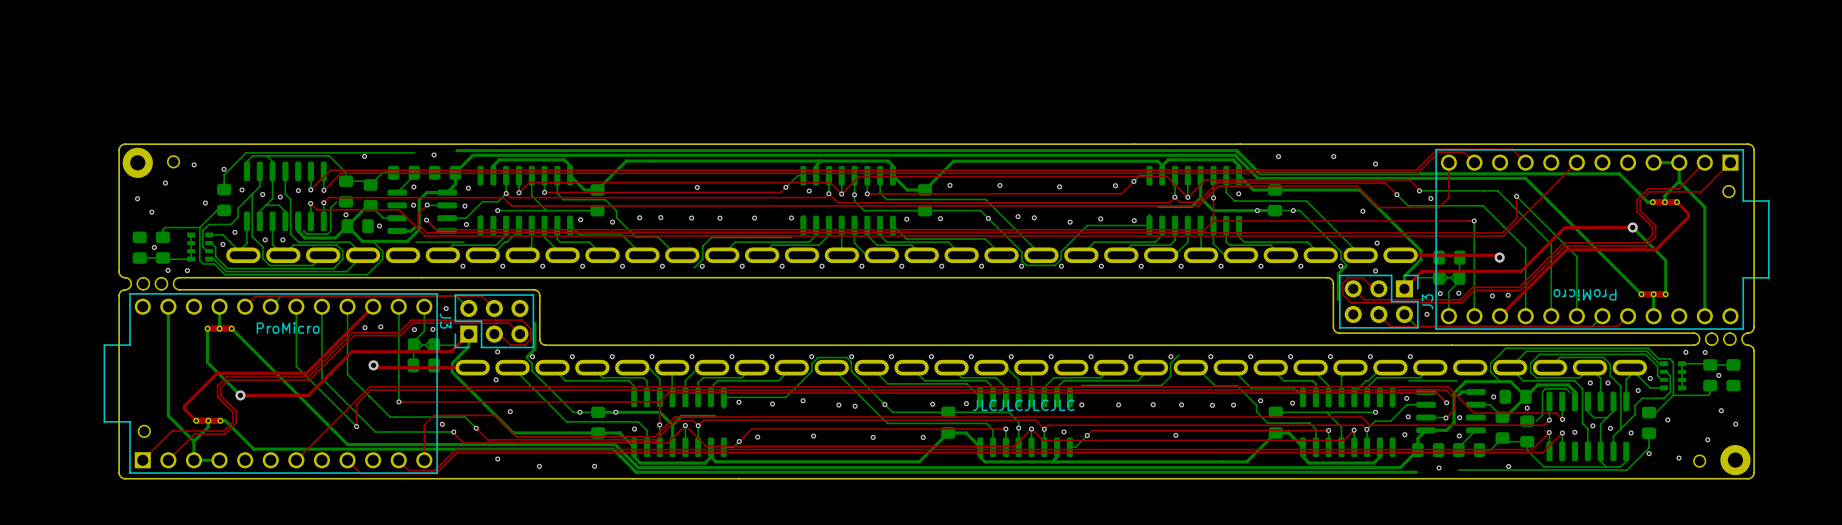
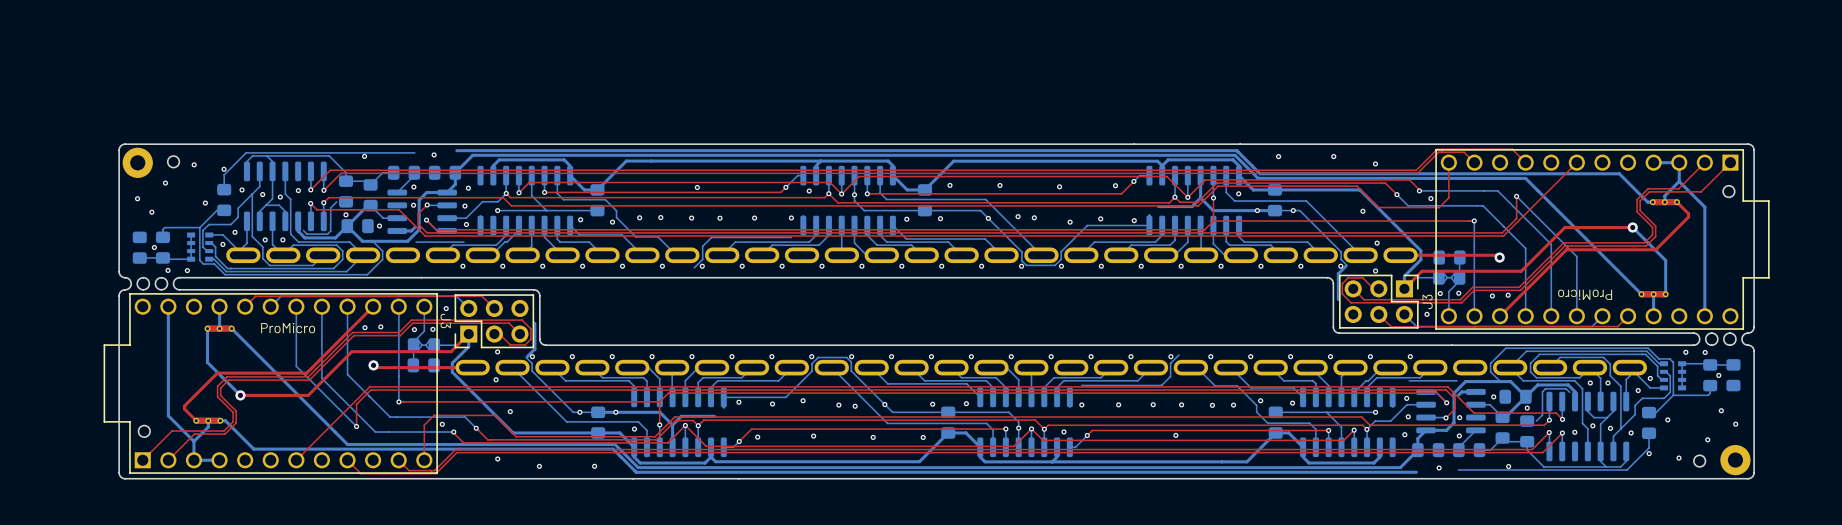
text: JLCJLCJLCJLC (1023, 405) -> none

